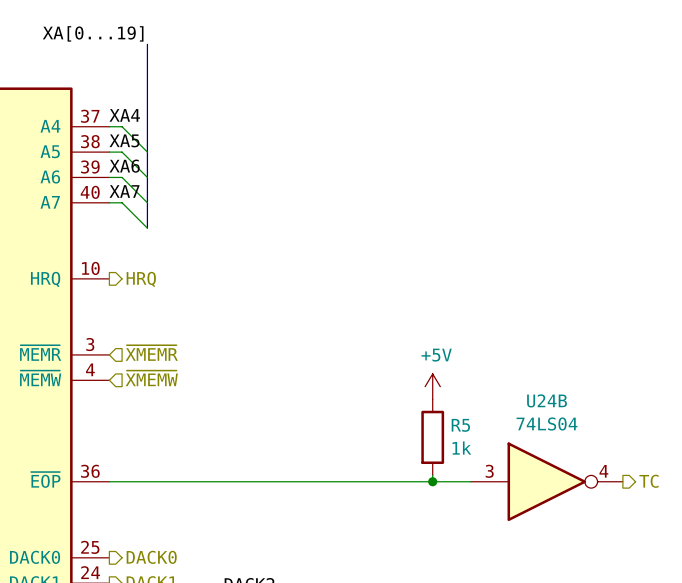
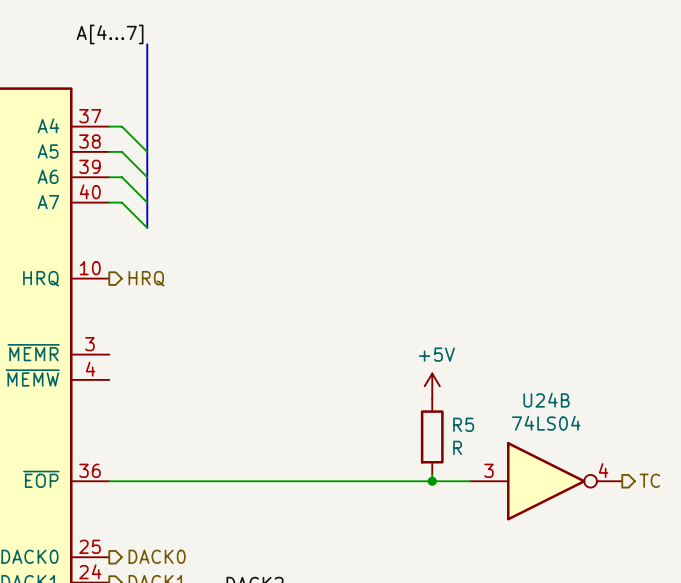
label: XA[0...19] (93, 33) -> A[4...7] (110, 34)
label: XA4 (124, 115) -> none
label: XA5 (124, 140) -> none
label: XA6 (124, 166) -> none
label: XA7 (124, 191) -> none
hierarchical label: ~{XMEMR} (151, 353) -> none
hierarchical label: ~{XMEMW} (151, 378) -> none
R5 value: 1k (461, 448) -> R (457, 447)

